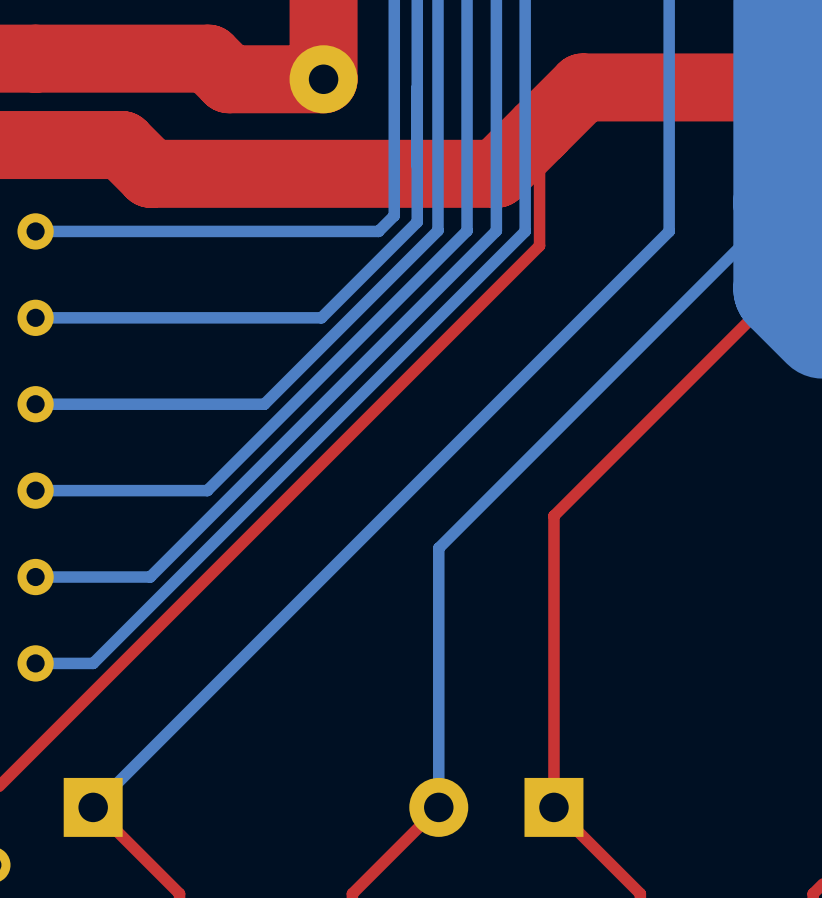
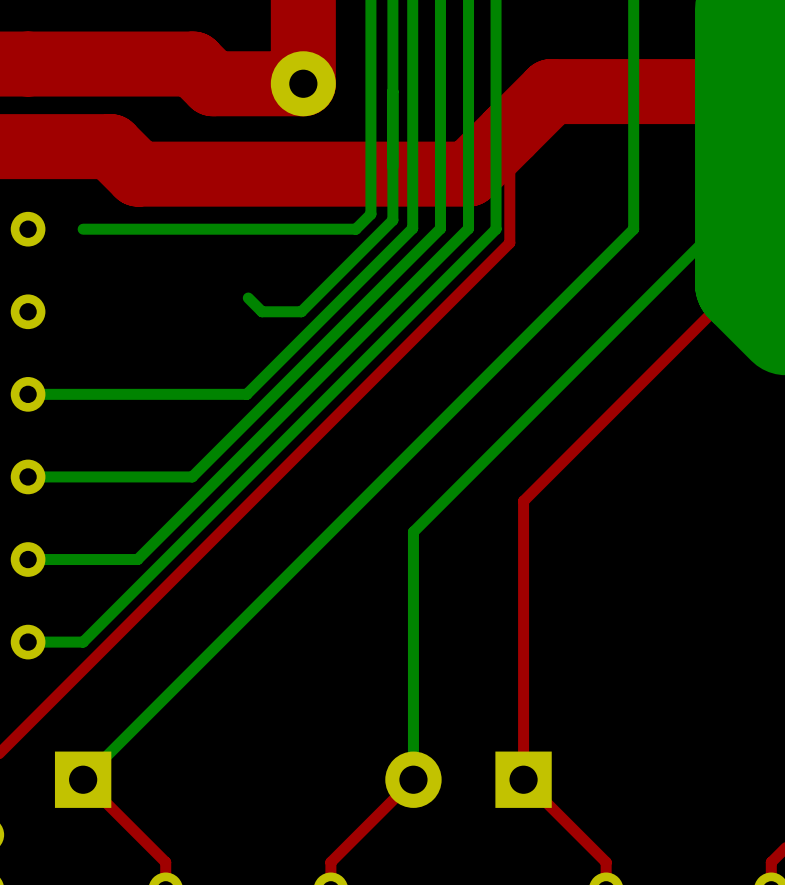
bottom track: (93, 231) (35, 231) -> none
bottom track: (280, 317) (35, 317) -> (262, 311) (248, 298)

